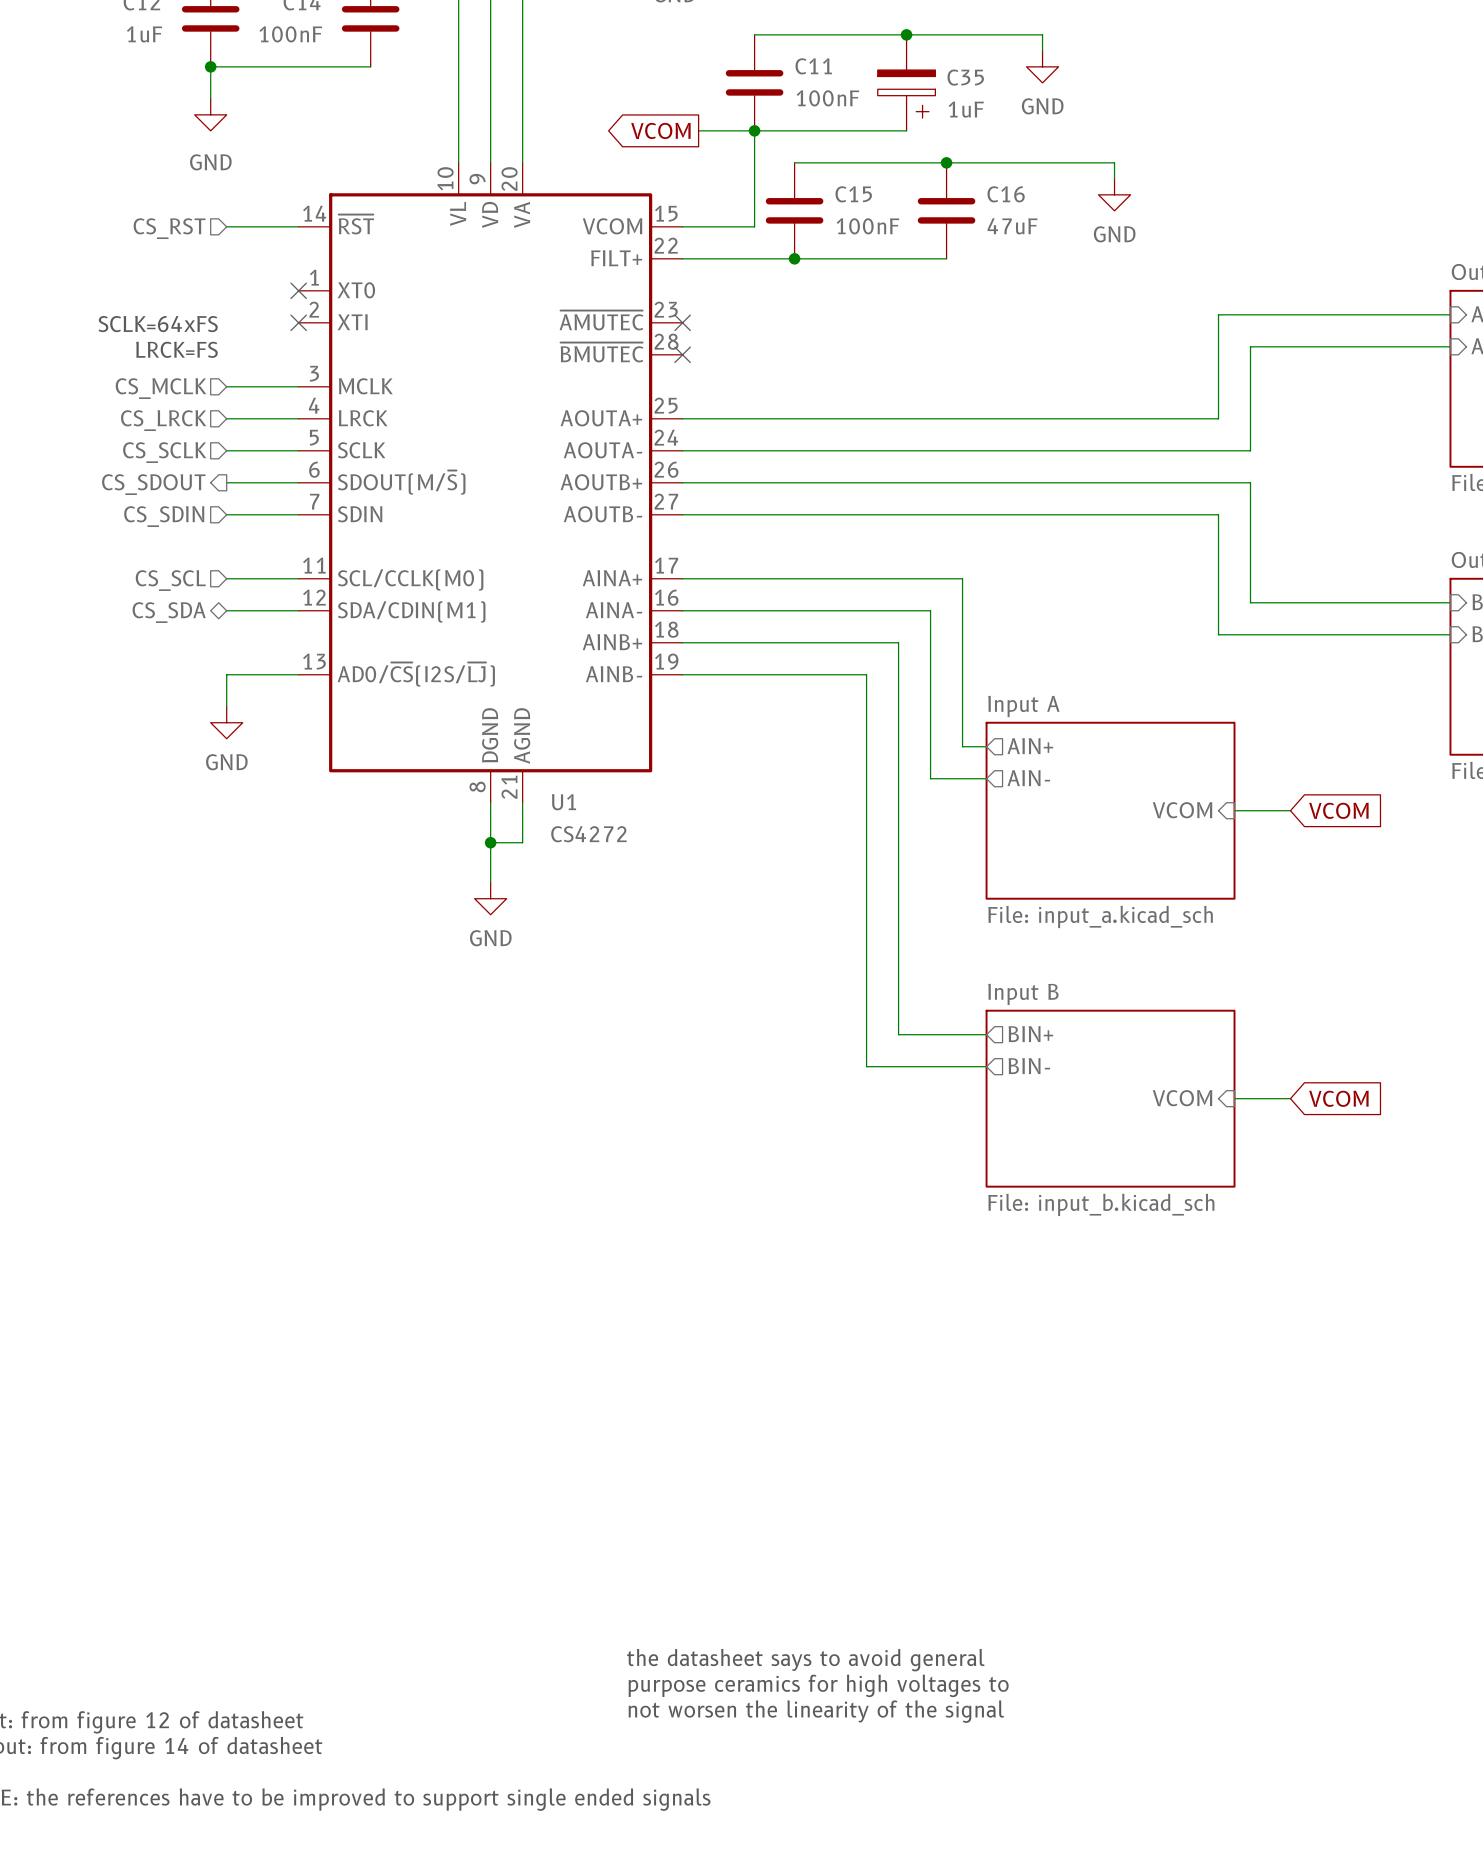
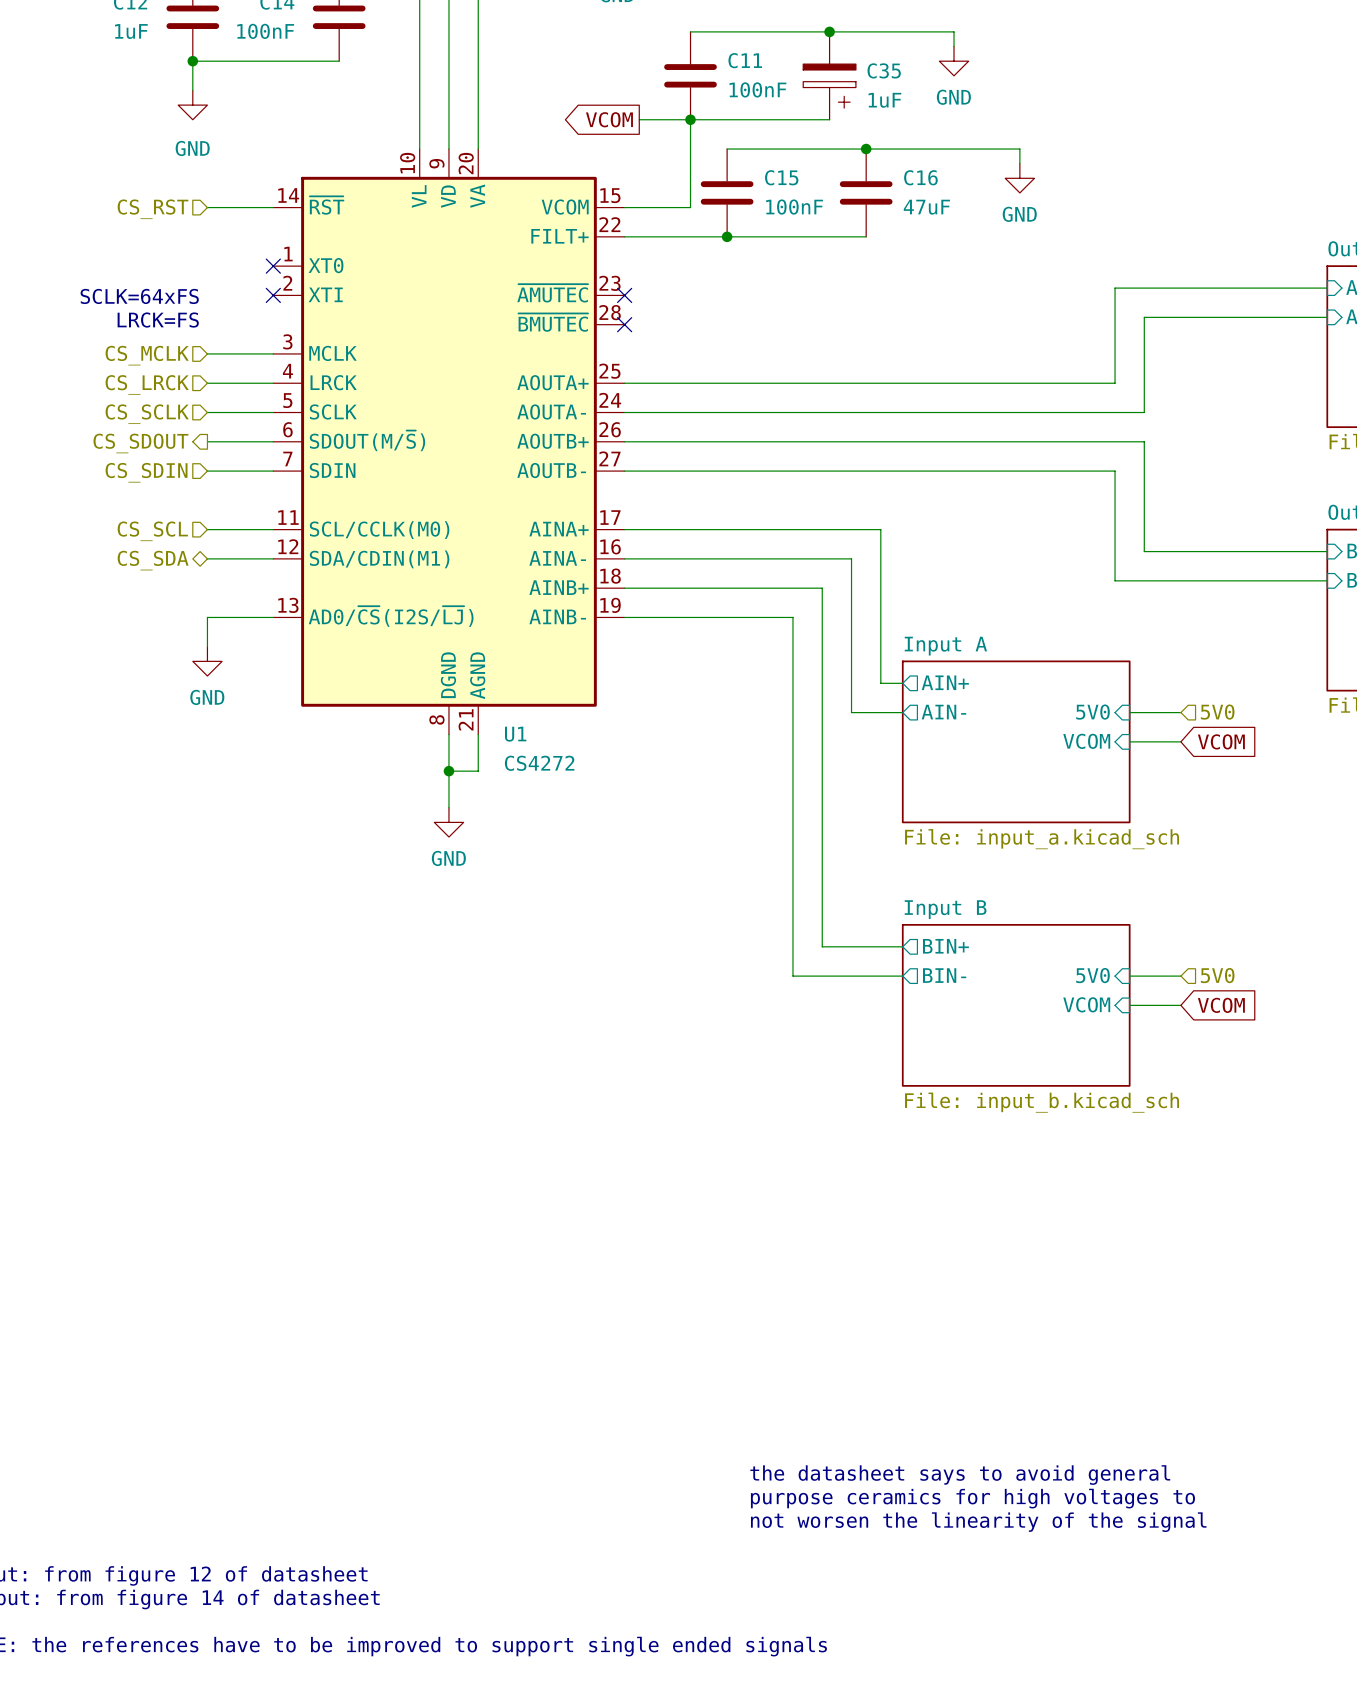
sheet pin: none -> 5V0 (1092, 712)
wire: none -> (1129, 712) (1180, 712)
hierarchical label: none -> 5V0 (1217, 712)
sheet pin: none -> 5V0 (1092, 975)
wire: none -> (1129, 976) (1180, 976)
hierarchical label: none -> 5V0 (1217, 975)
text position: the datasheet says to avoid general (805, 1660) -> the datasheet says to avoid general (960, 1475)
text position: purpose ceramics for high voltages to (818, 1685) -> purpose ceramics for high voltages to (972, 1498)
text position: not worsen the linearity of the signal (816, 1711) -> not worsen the linearity of the signal (978, 1522)

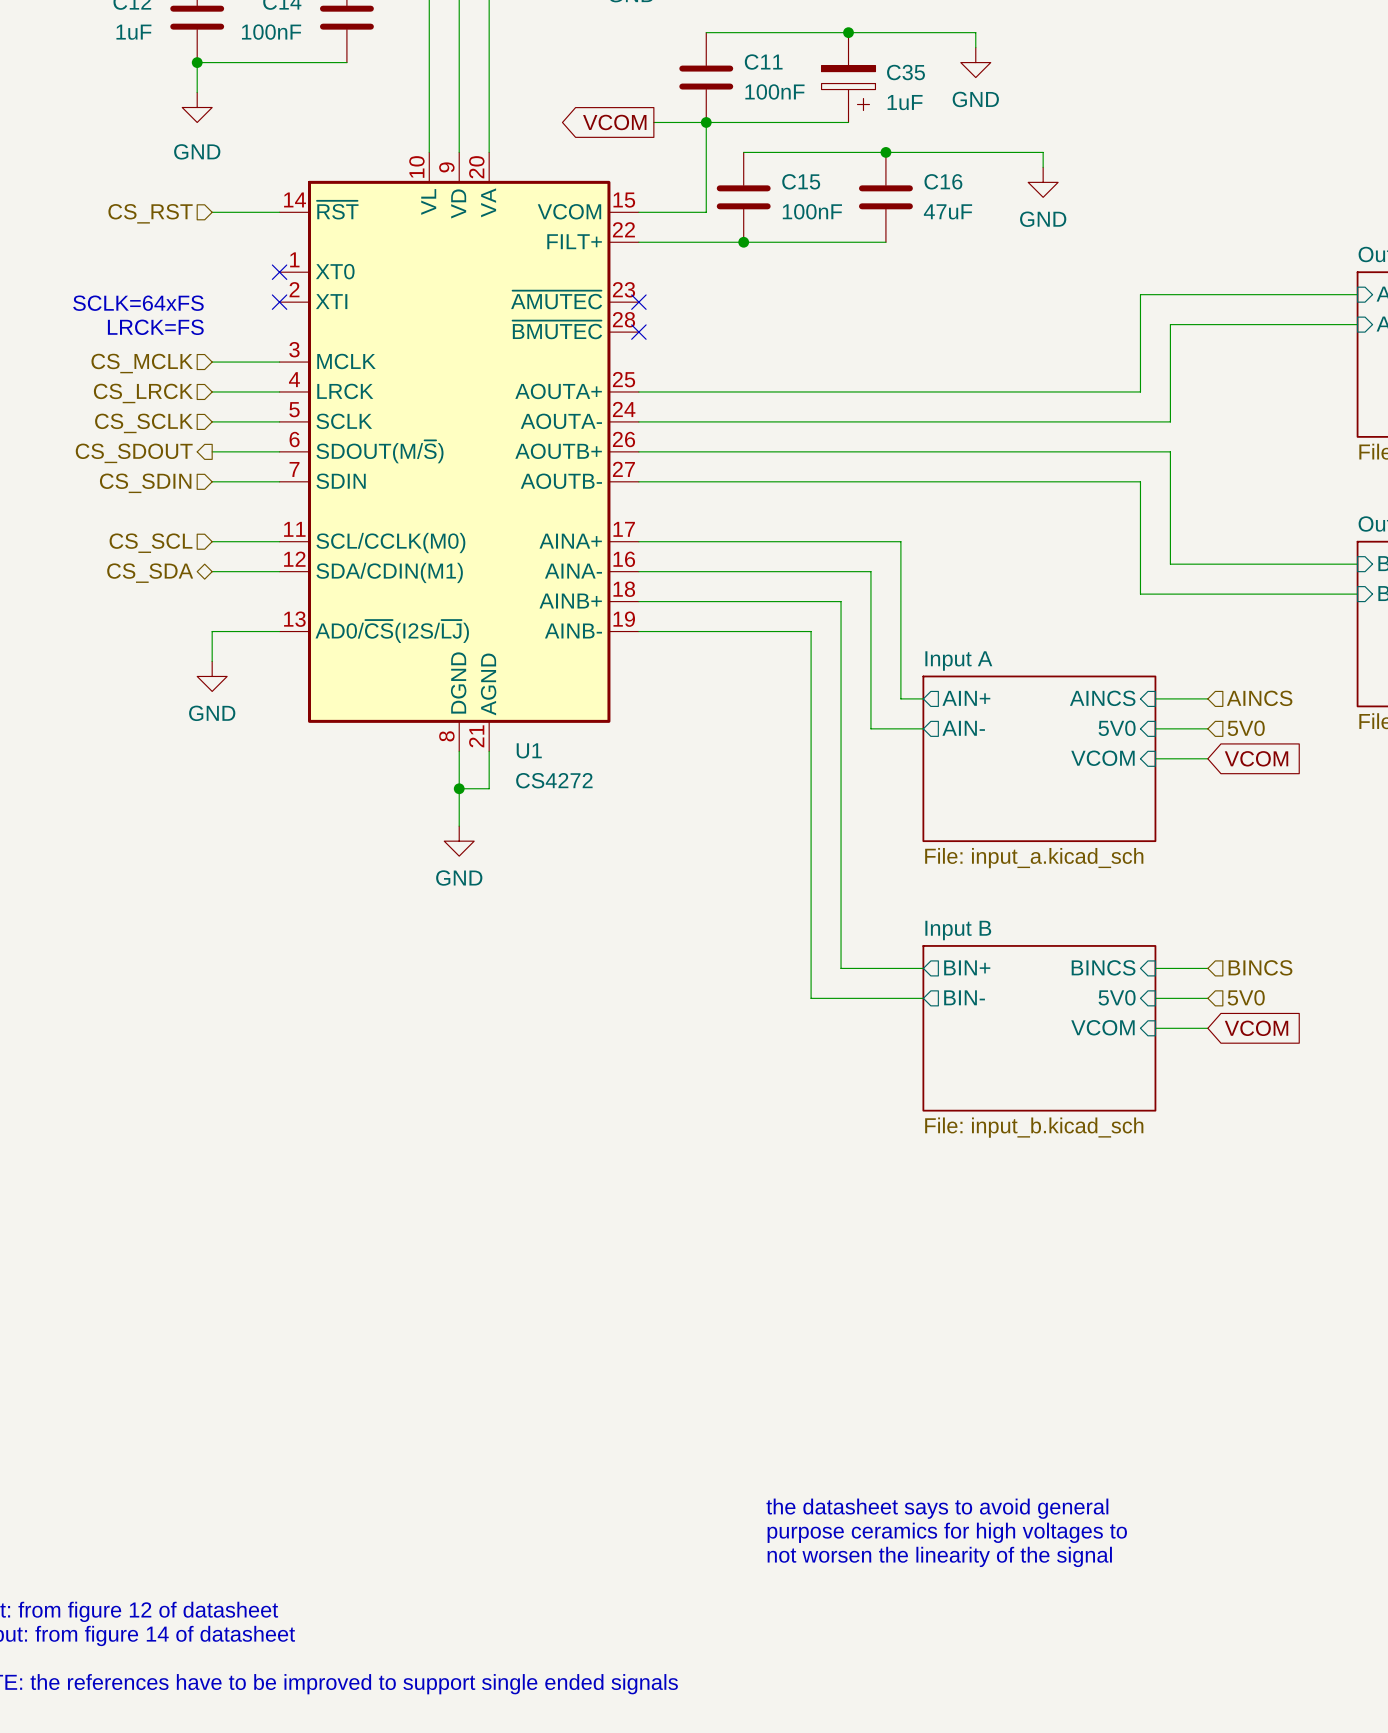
sheet pin: none -> AINCS (1102, 698)
hierarchical label: none -> AINCS (1259, 698)
wire: none -> (1155, 698) (1207, 698)
sheet pin: none -> BINCS (1103, 967)
wire: none -> (1155, 968) (1207, 968)
hierarchical label: none -> BINCS (1260, 967)

